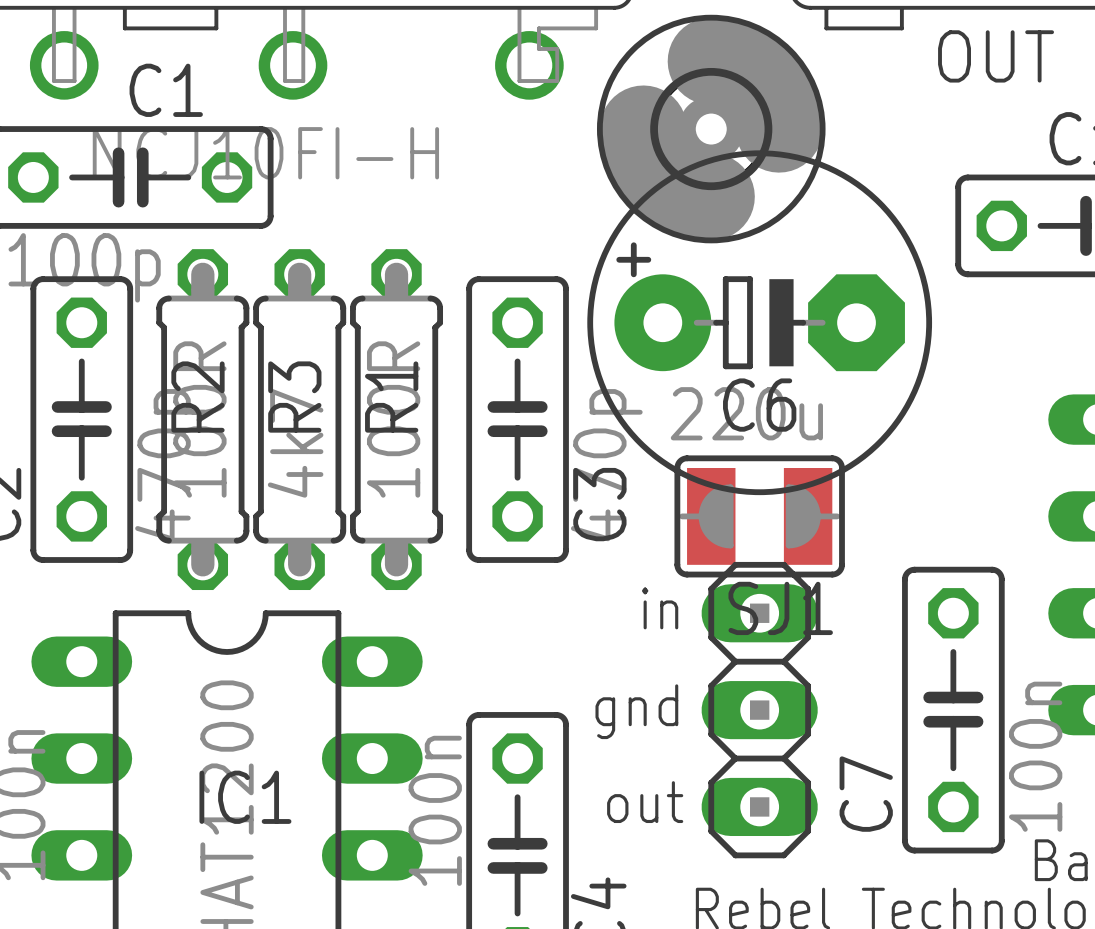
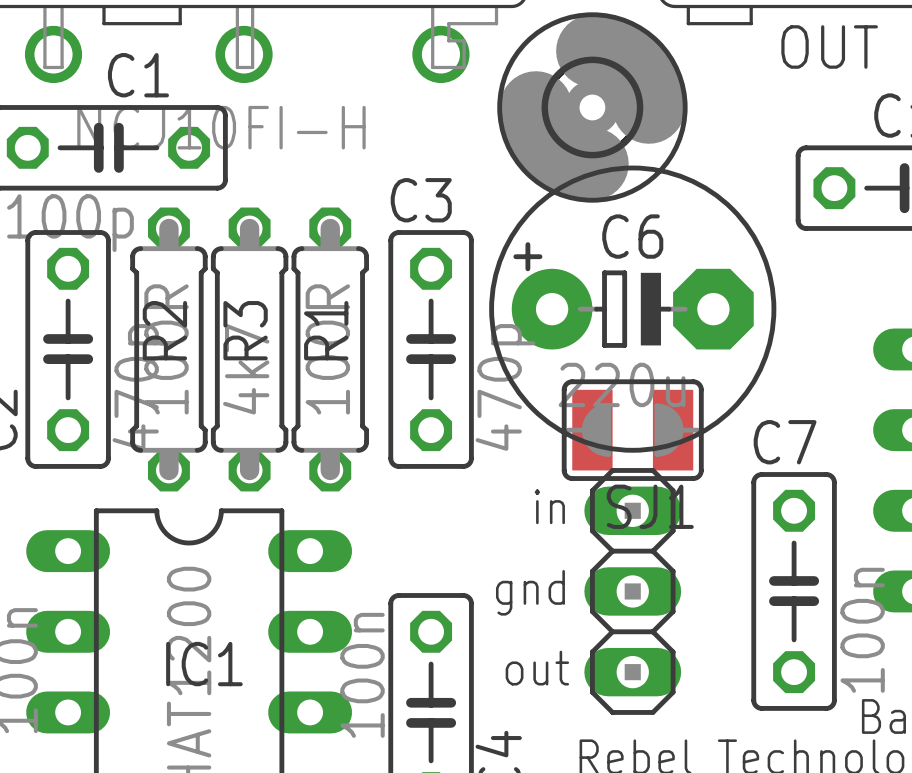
C6 position: (759, 322) -> (632, 309)
C6 name position: C6 (759, 405) -> C6 (632, 236)
C3 name rotation: 0° (599, 504) -> 90° clockwise (421, 200)
C3 name position: C3 (599, 504) -> C3 (421, 200)
C7 name rotation: 0° (866, 794) -> 90° clockwise (785, 442)
C7 name position: C7 (866, 794) -> C7 (785, 442)

